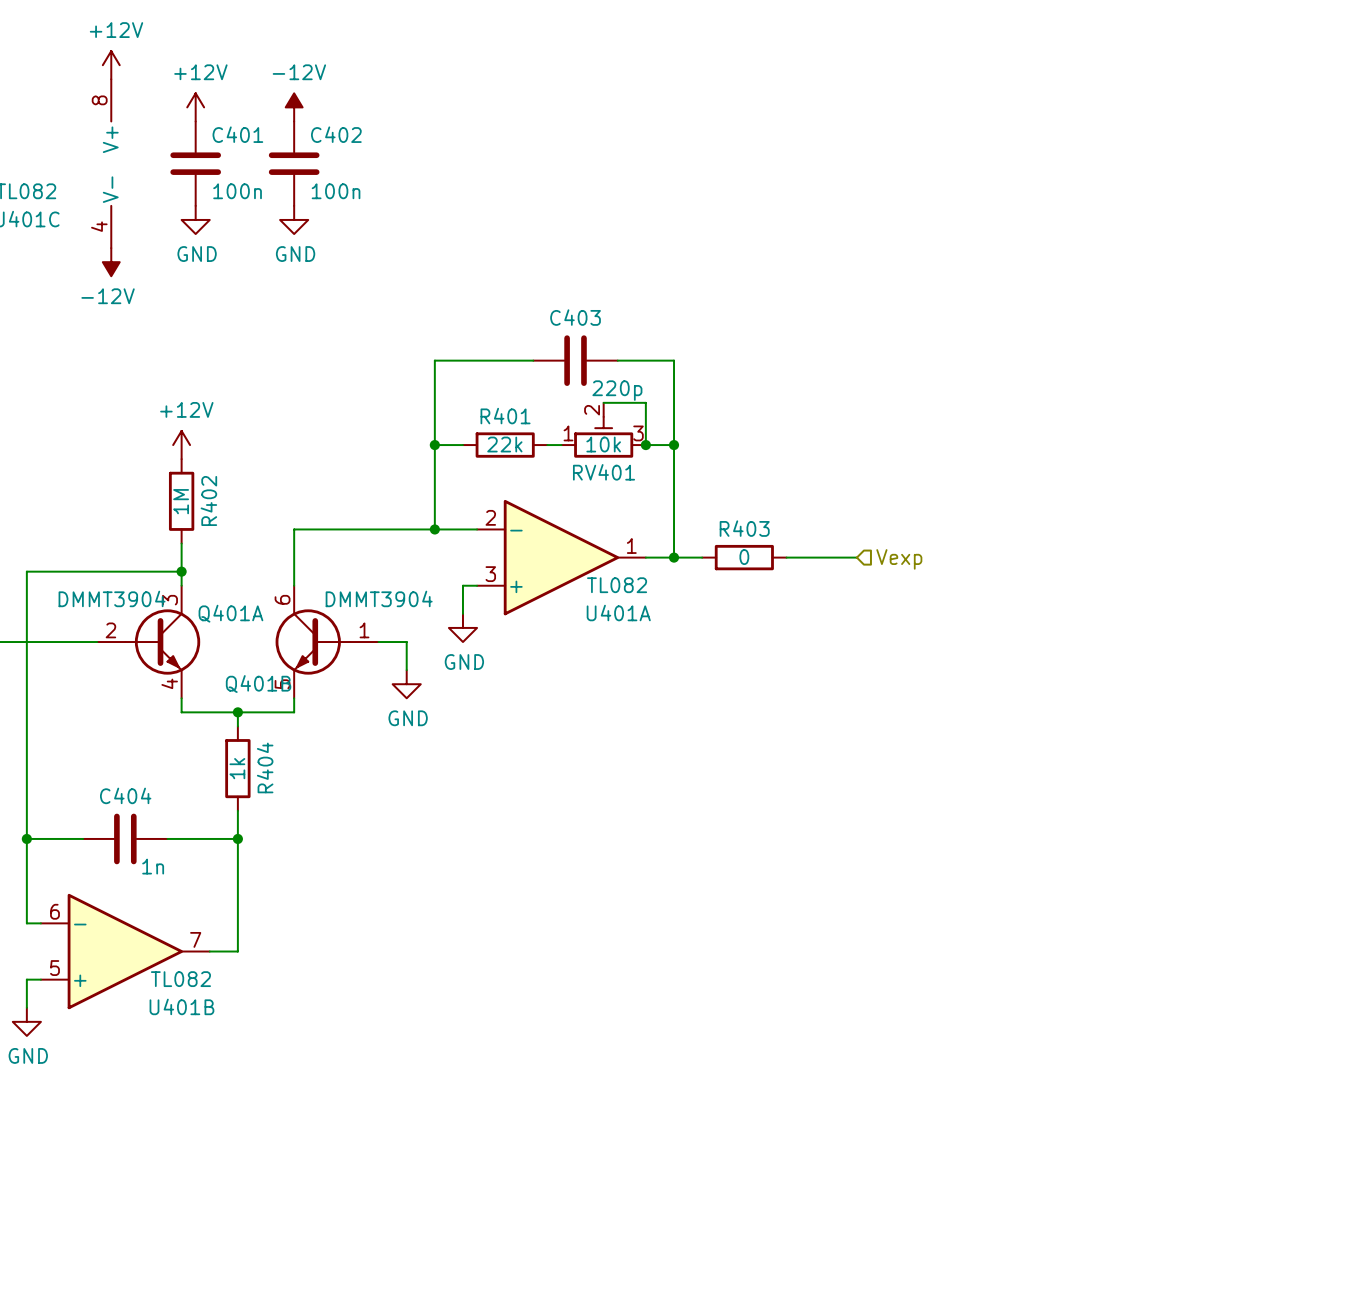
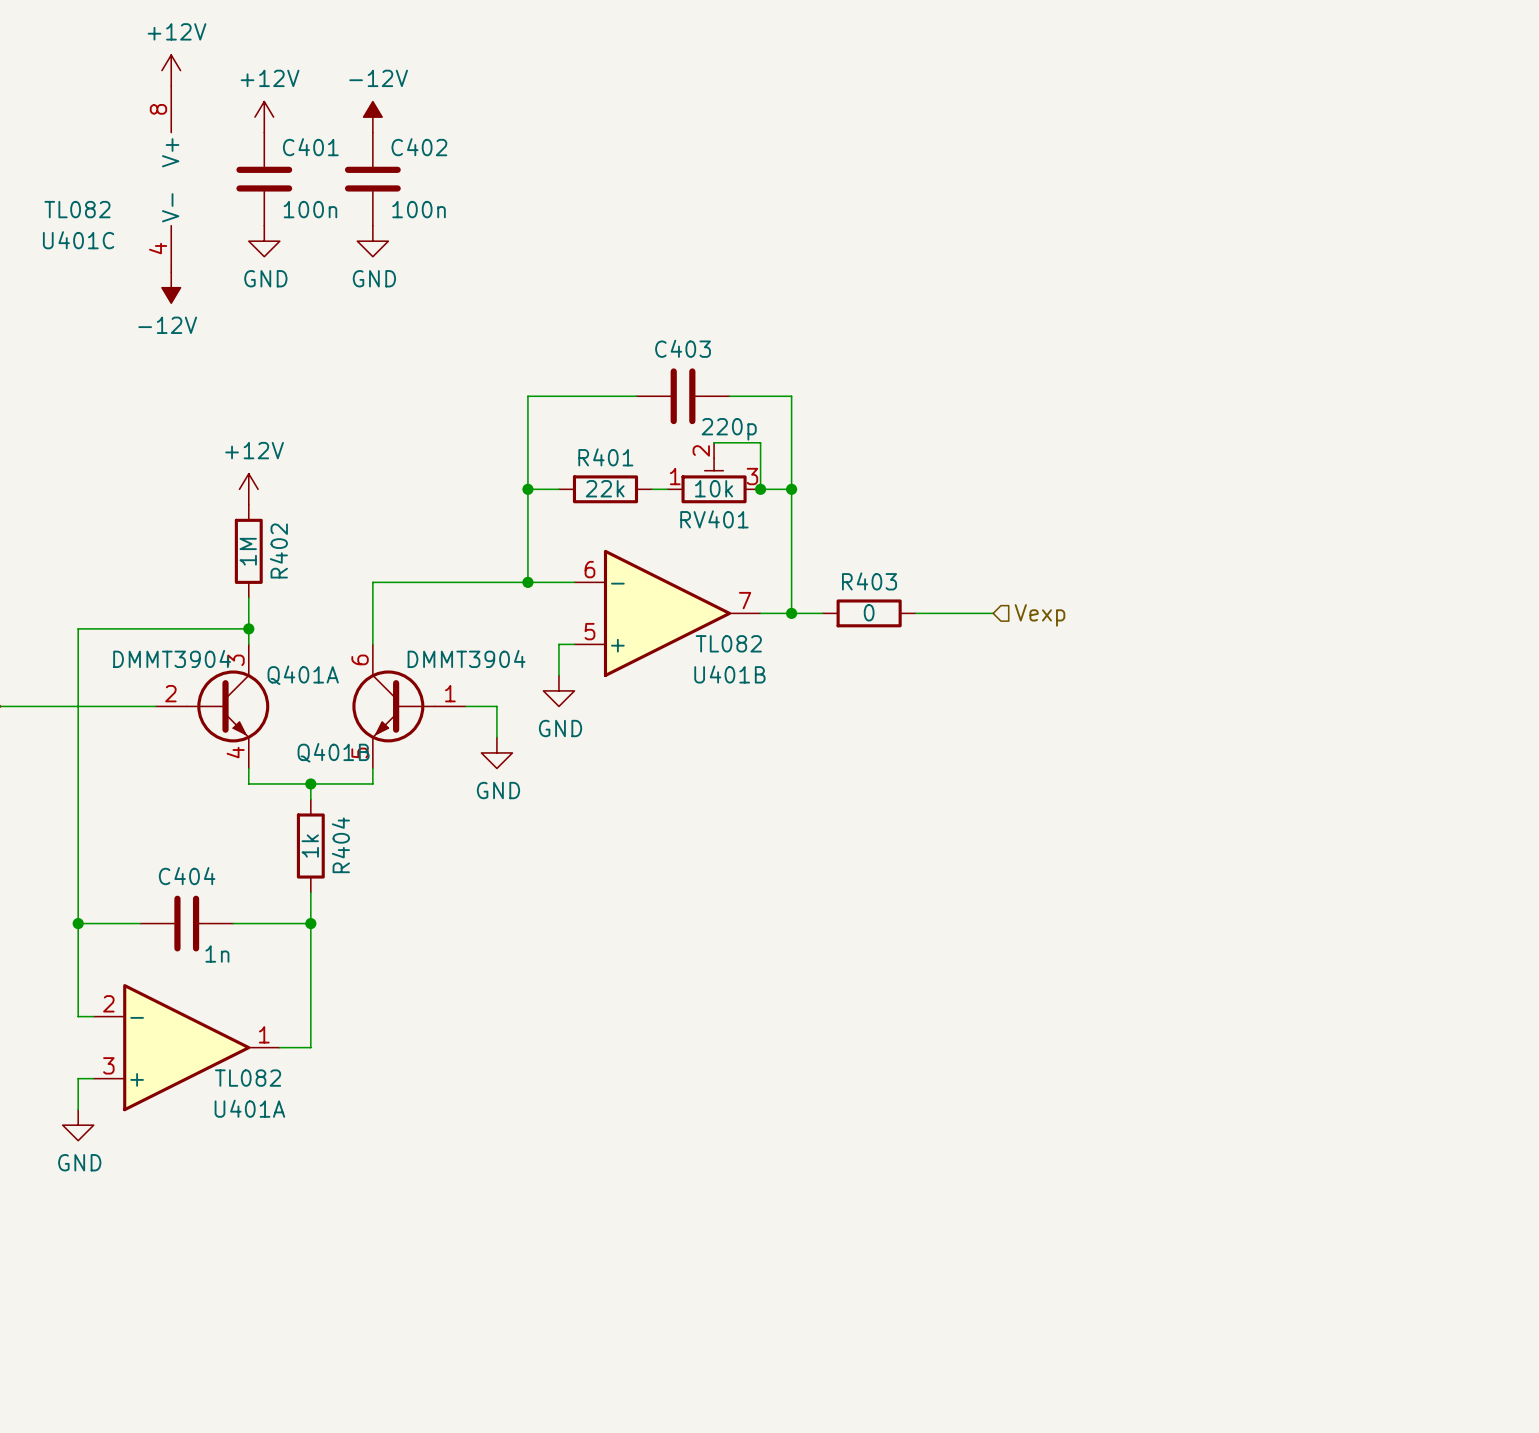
U401A position: (561, 557) -> (186, 1047)
U401B position: (125, 951) -> (667, 613)

